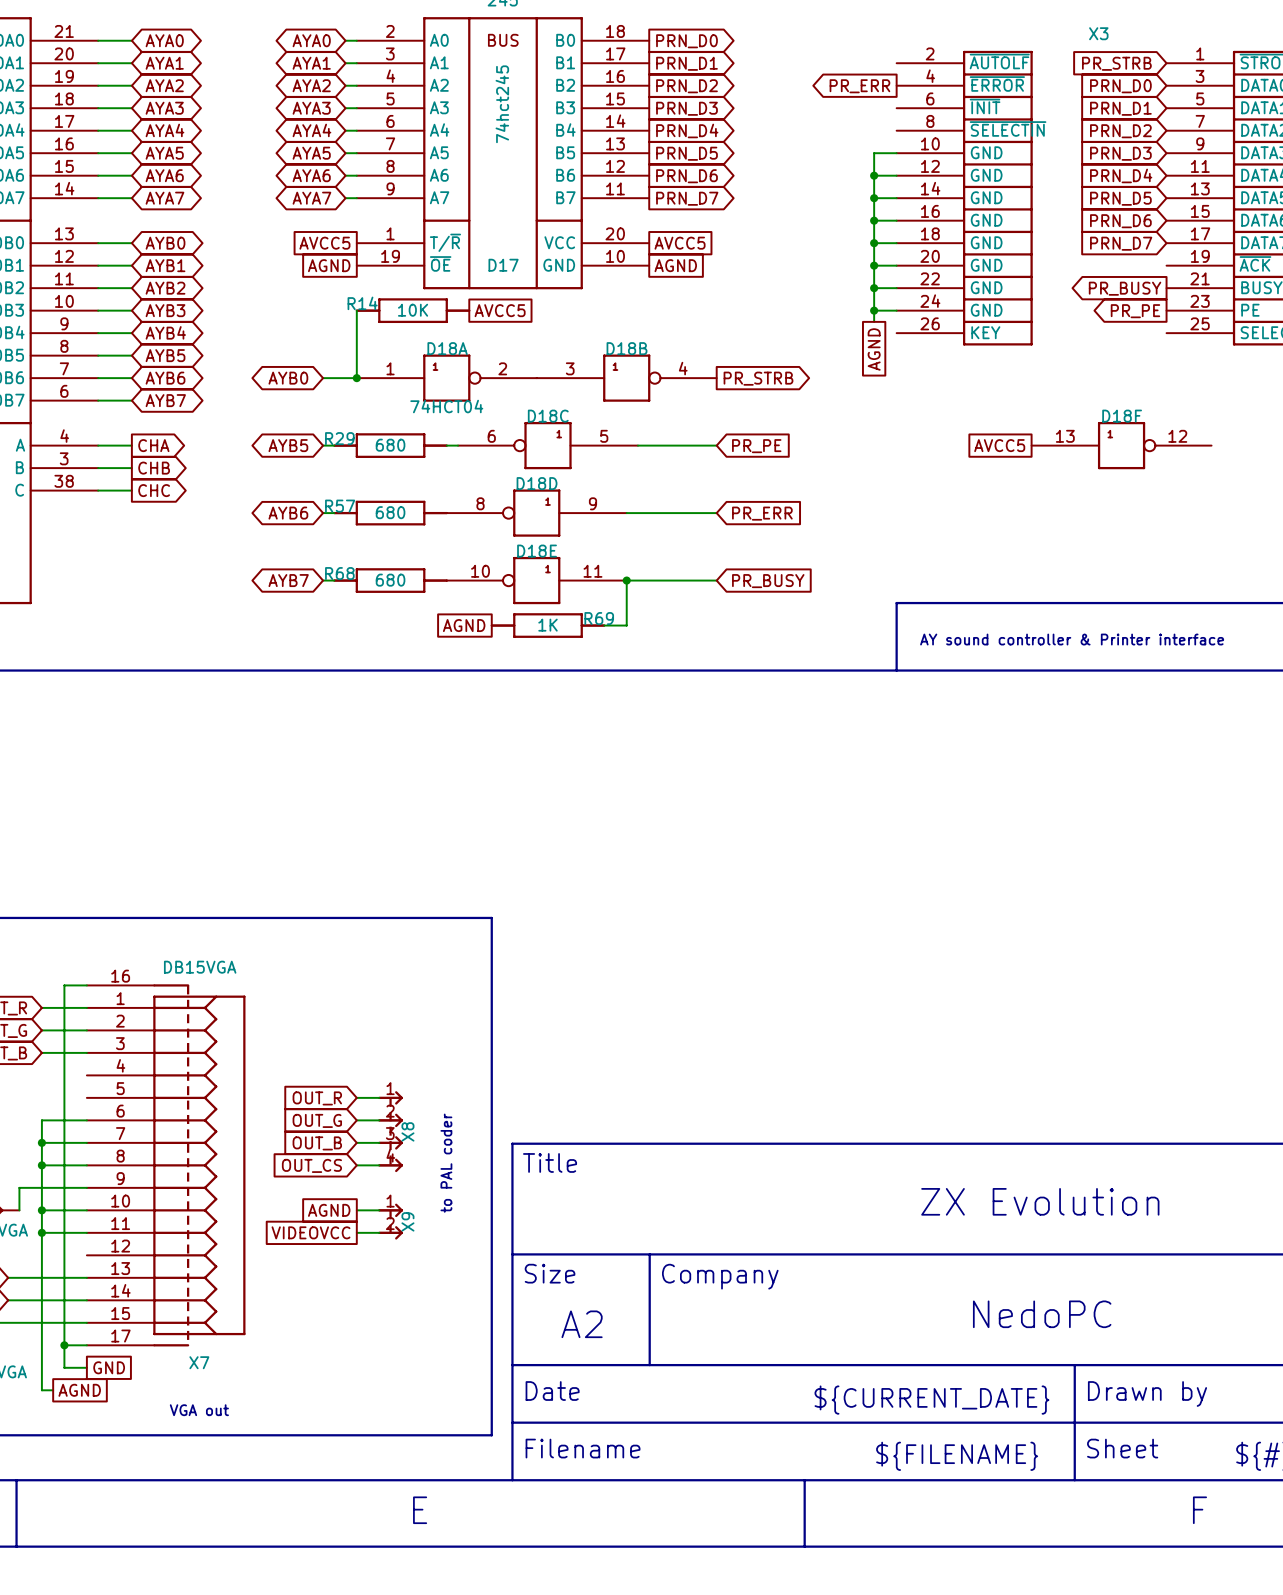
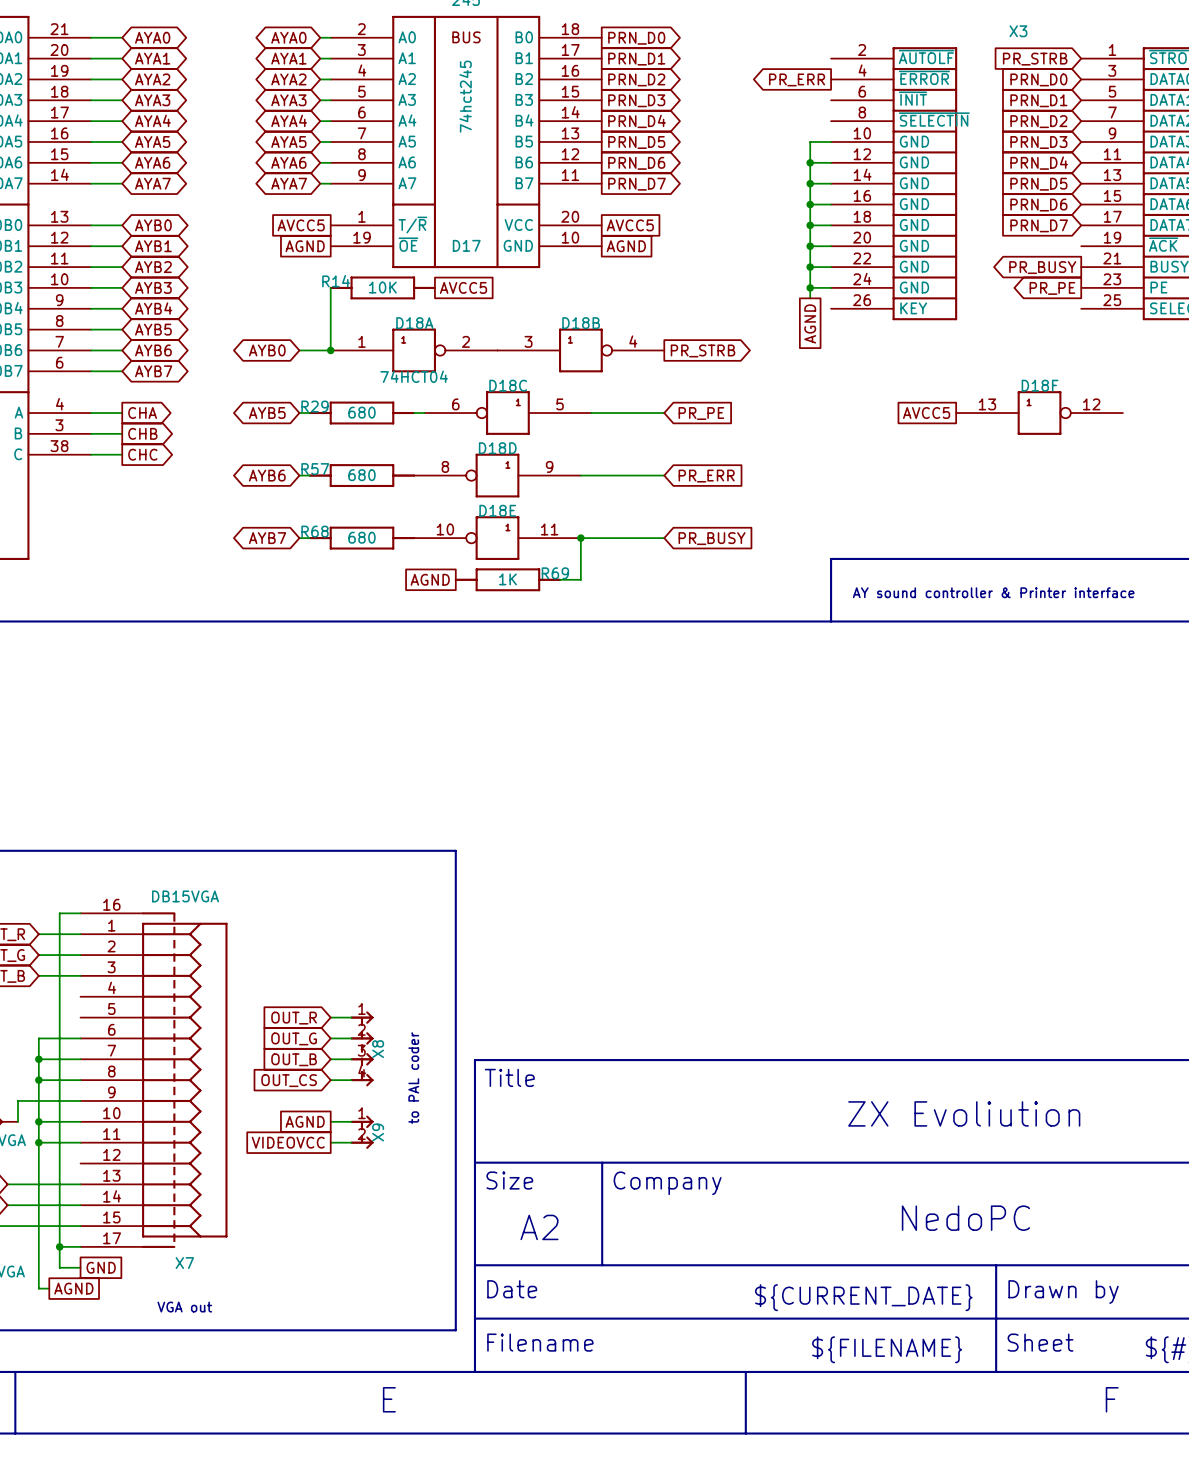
text: ZX Evolution (1040, 1201) -> ZX Evoliution (964, 1113)

